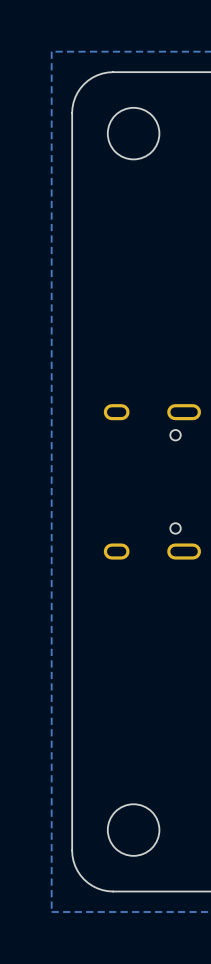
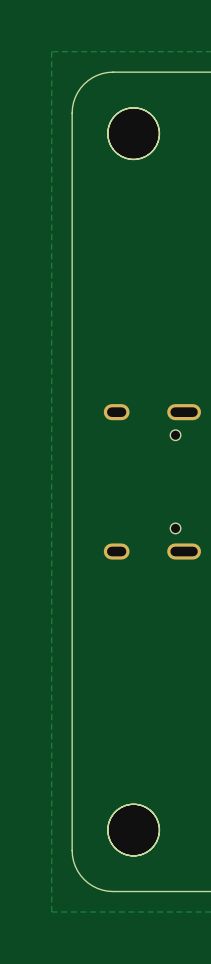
part: none -> (133, 133)
part: none -> (133, 830)

